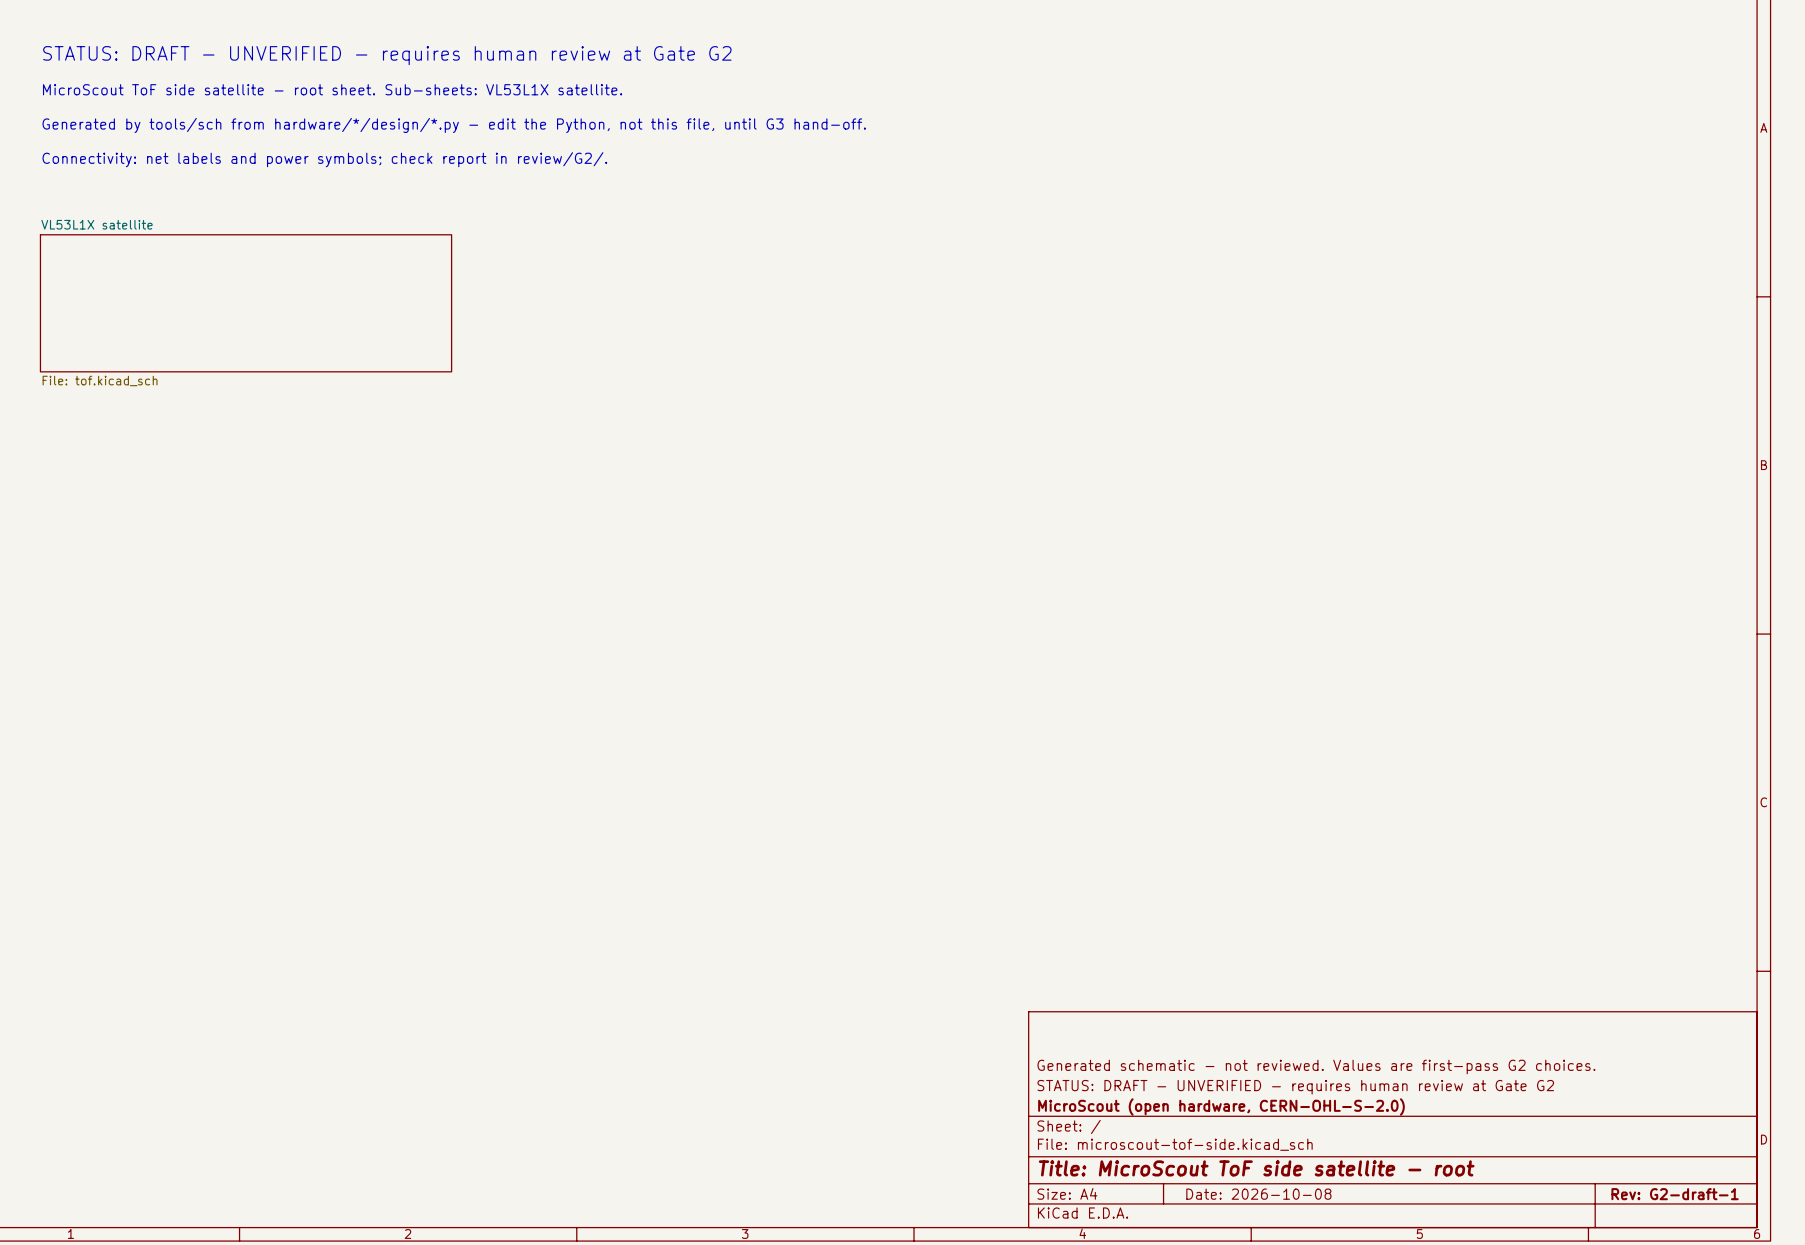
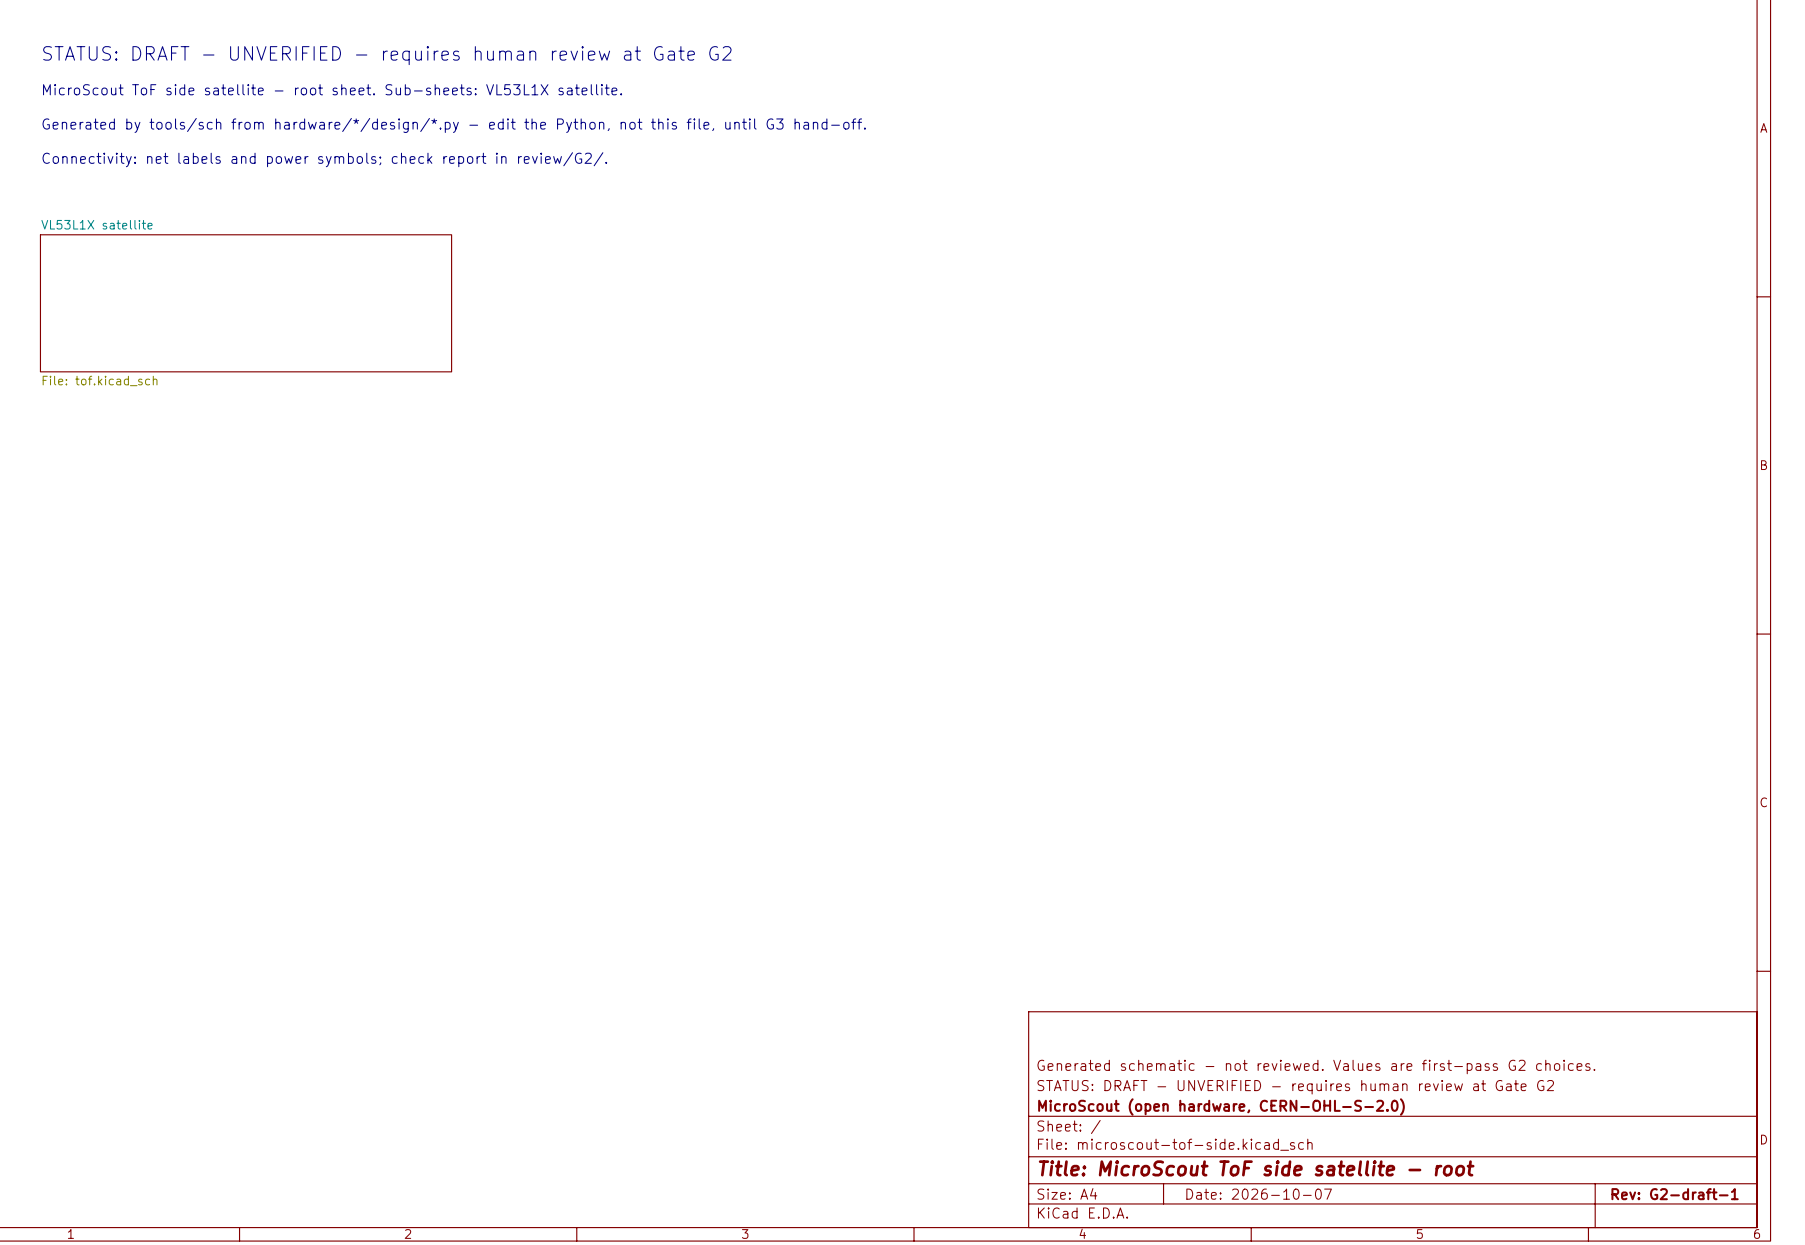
title block: Date: 2026-10-08 (1258, 1194) -> Date: 2026-10-07 (1259, 1194)

